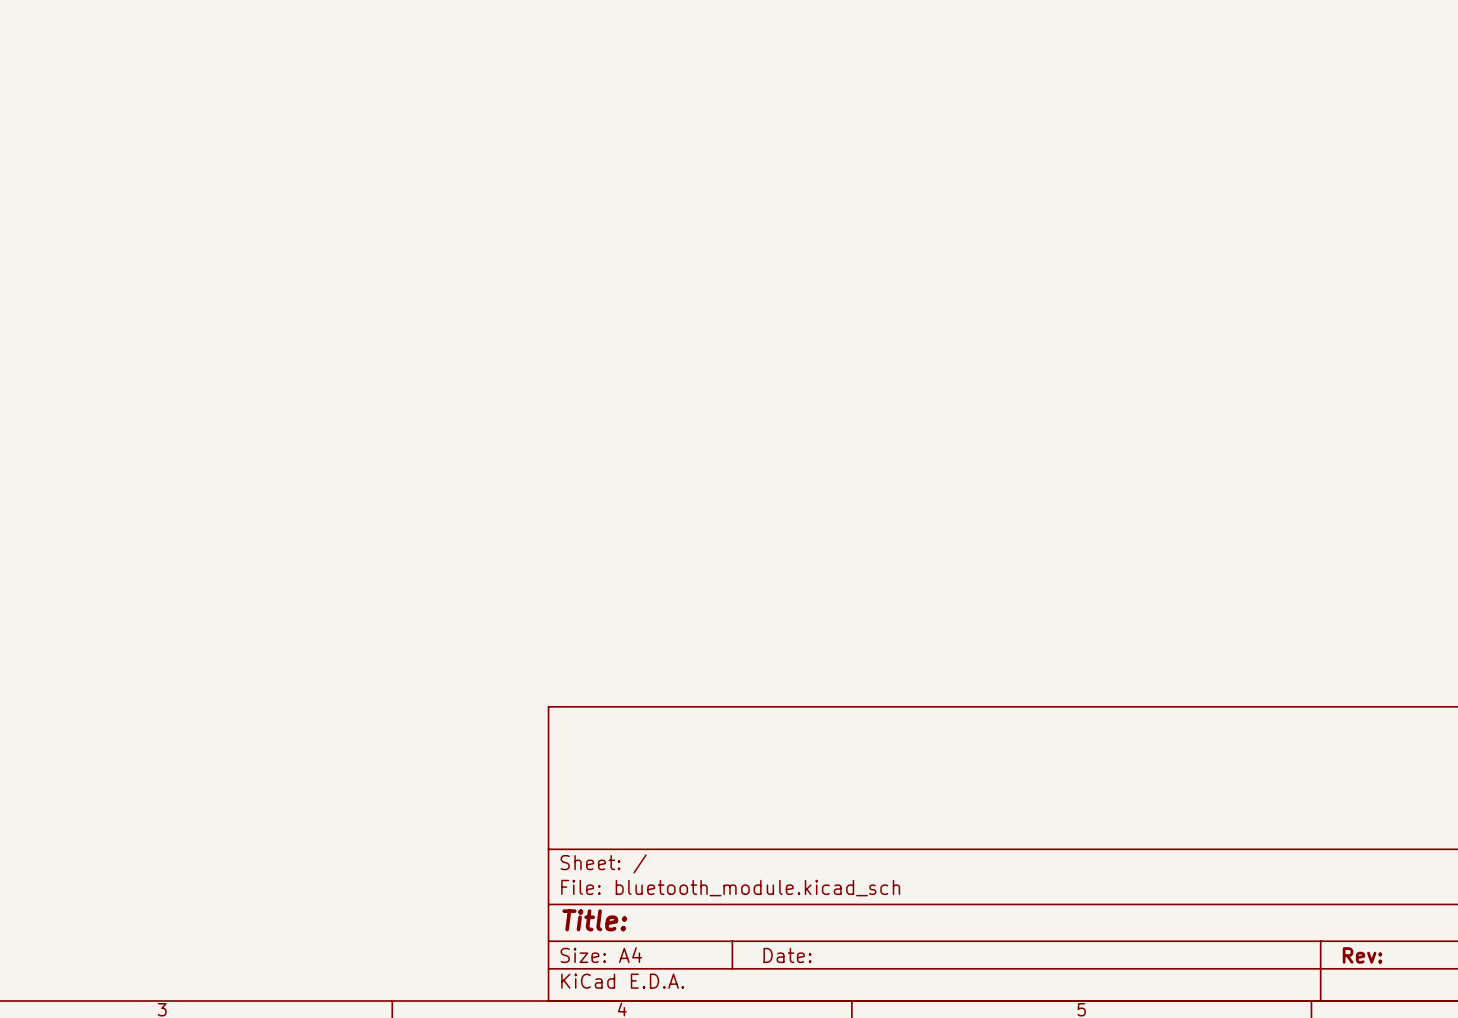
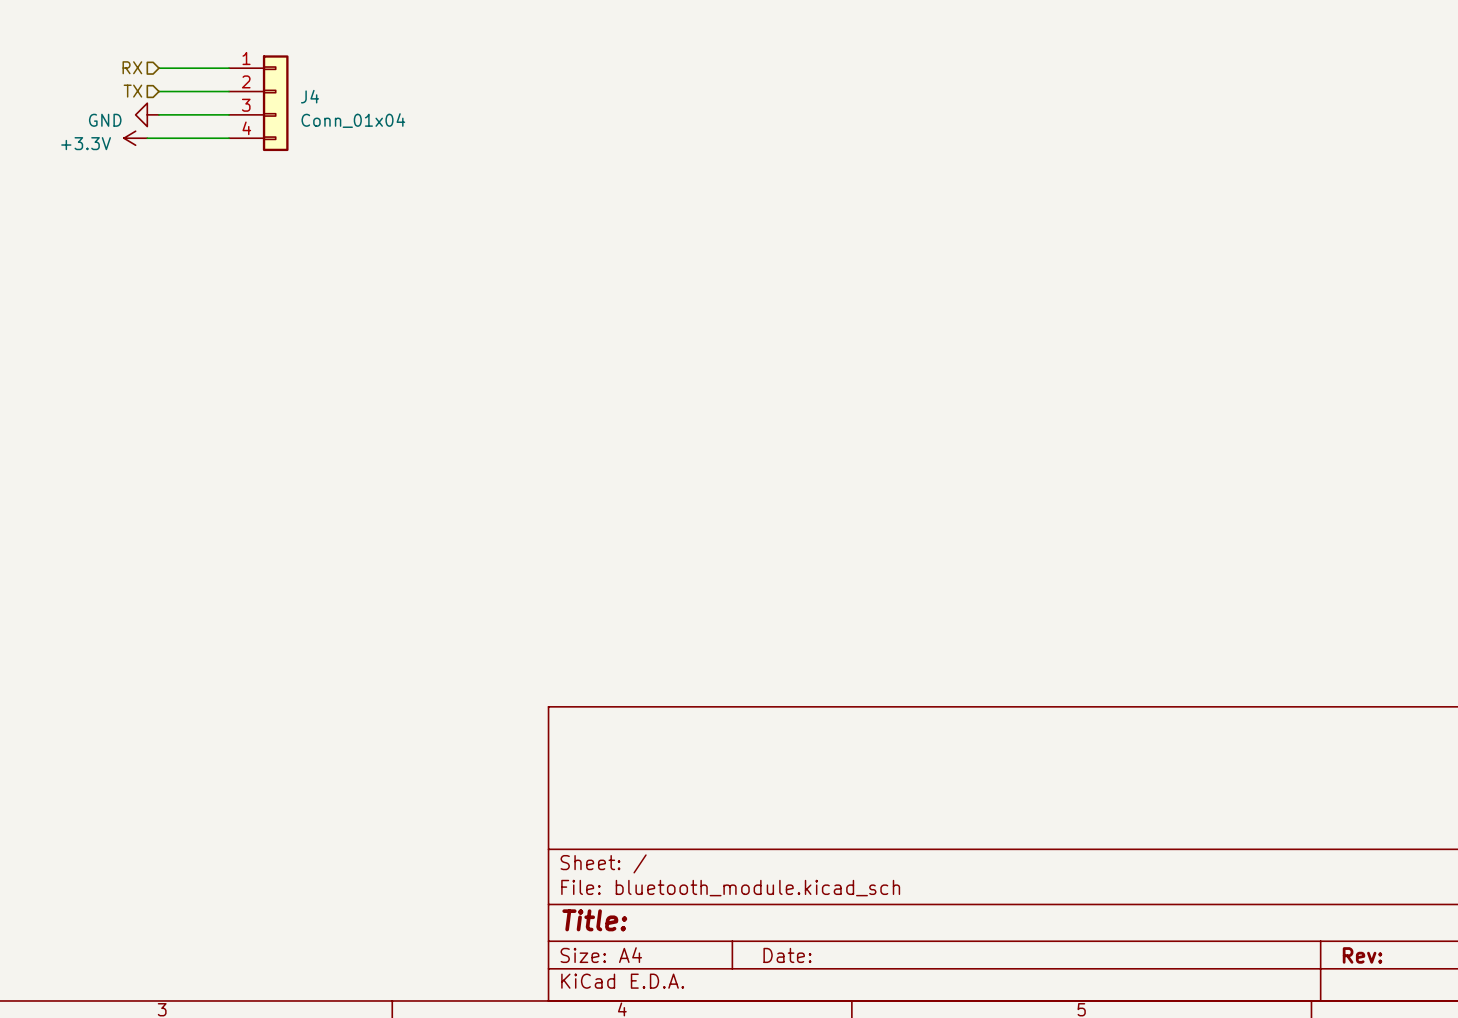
hierarchical label: none -> RX (132, 67)
wire: none -> (158, 68) (229, 68)
hierarchical label: none -> TX (132, 91)
wire: none -> (158, 91) (229, 91)
J4: none -> Conn_01x04 (258, 103)
power symbol: none -> GND (147, 114)
wire: none -> (158, 114) (229, 114)
power symbol: none -> +3.3V (135, 138)
wire: none -> (147, 138) (229, 138)

